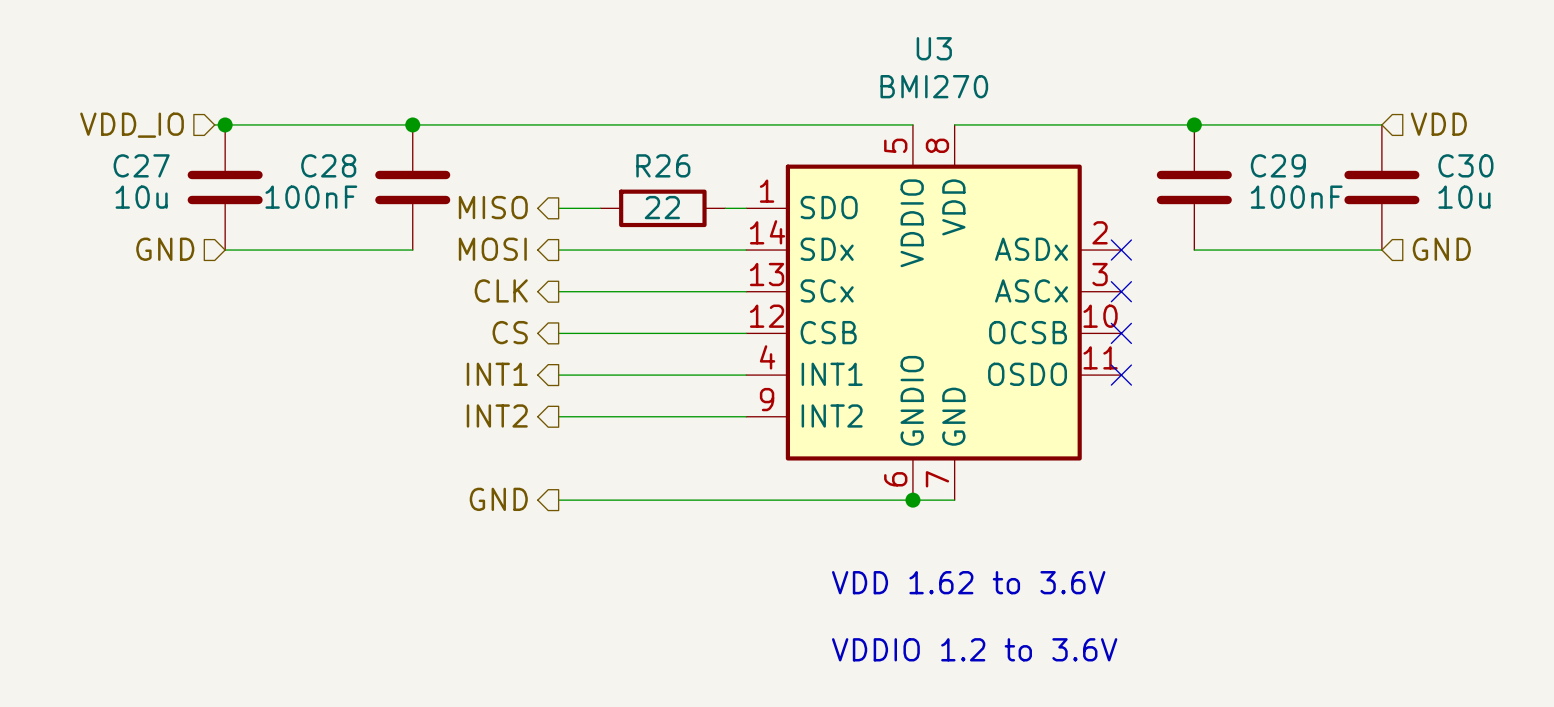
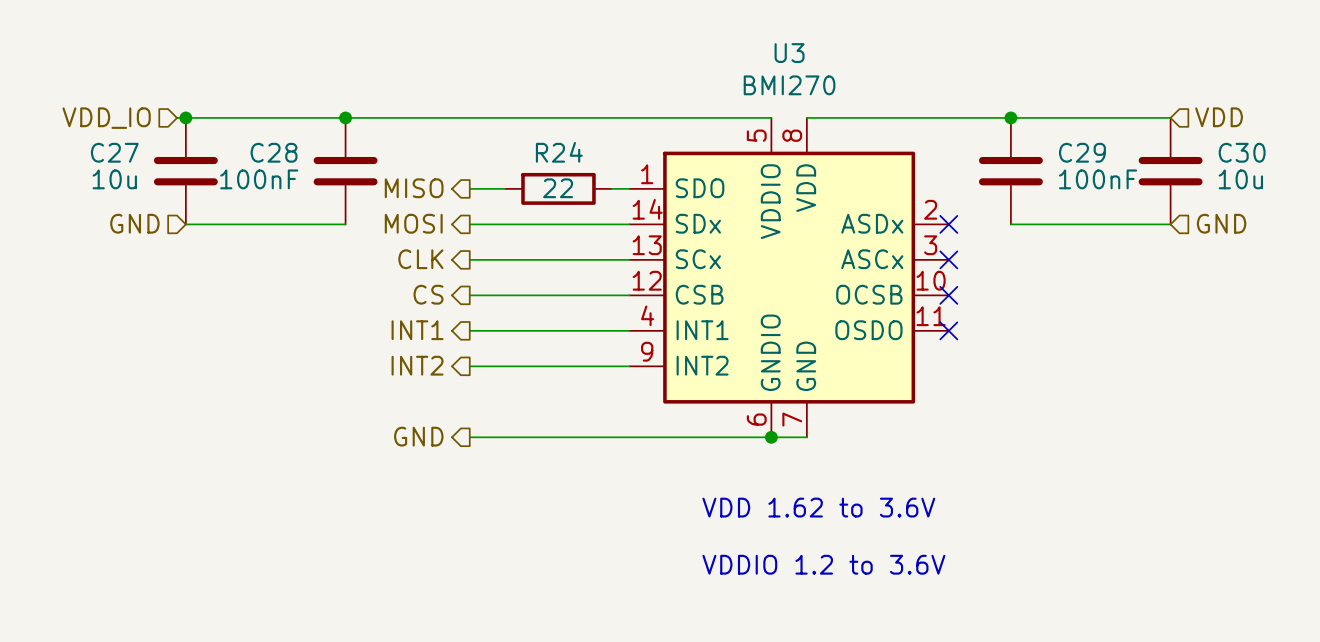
R26 name: R26 (663, 165) -> R24 (559, 152)

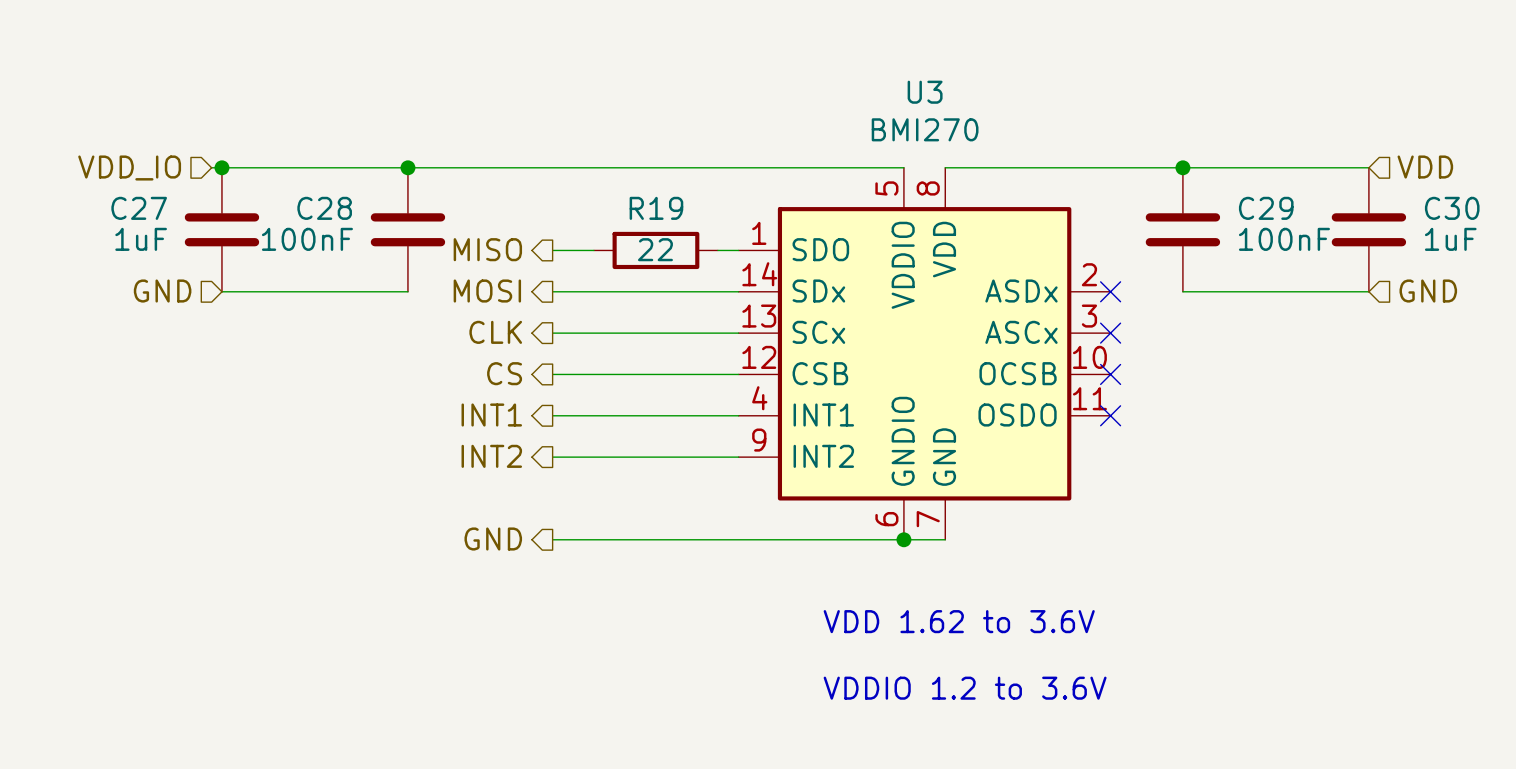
R24 name: R24 (559, 152) -> R19 (656, 208)
C27 value: 10u (114, 179) -> 1uF (141, 239)
C30 value: 10u (1240, 179) -> 1uF (1450, 239)

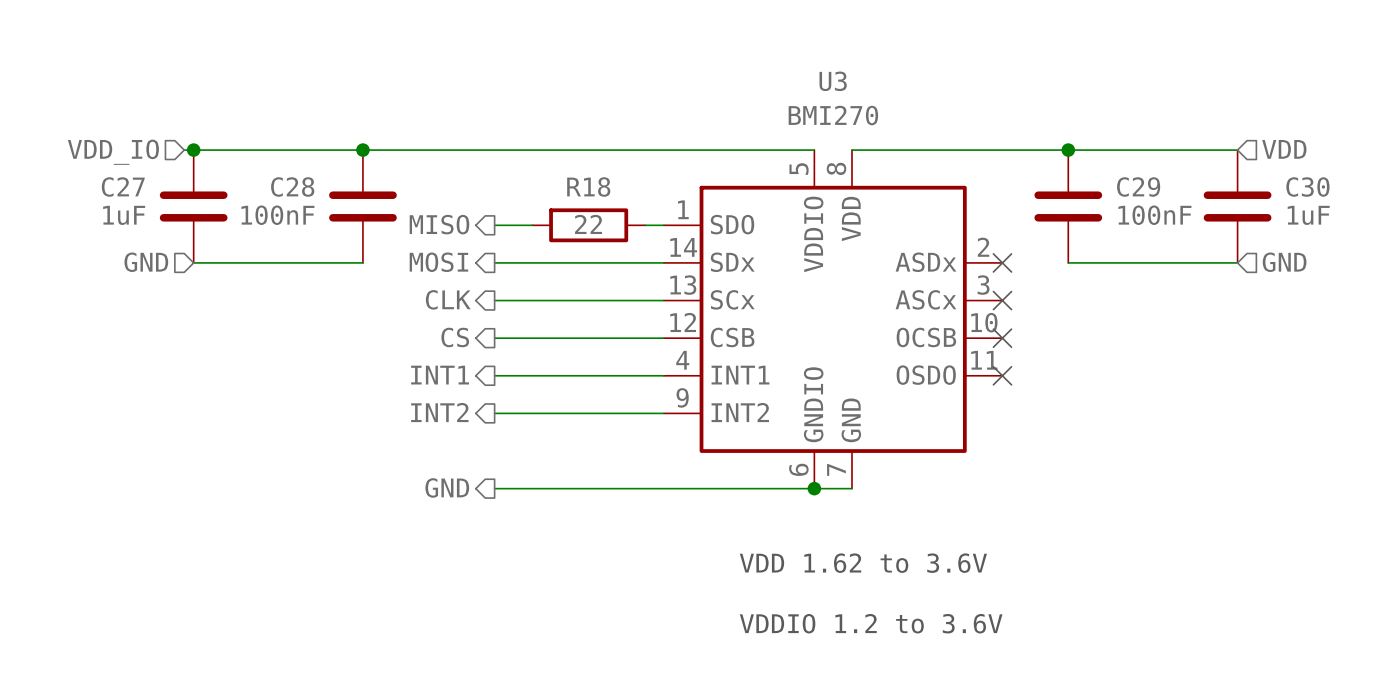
R19 name: R19 (656, 208) -> R18 (588, 187)

